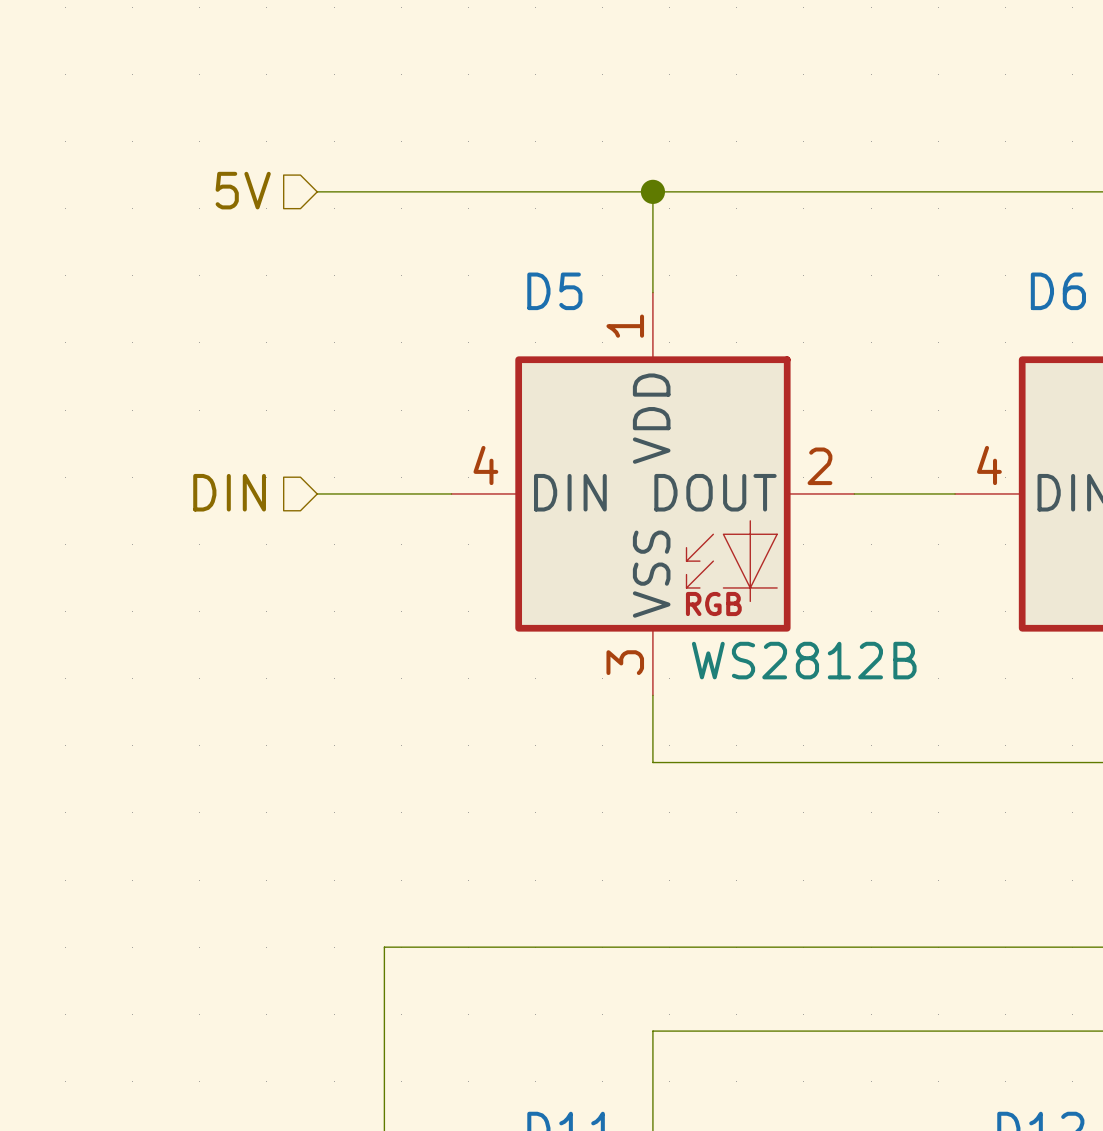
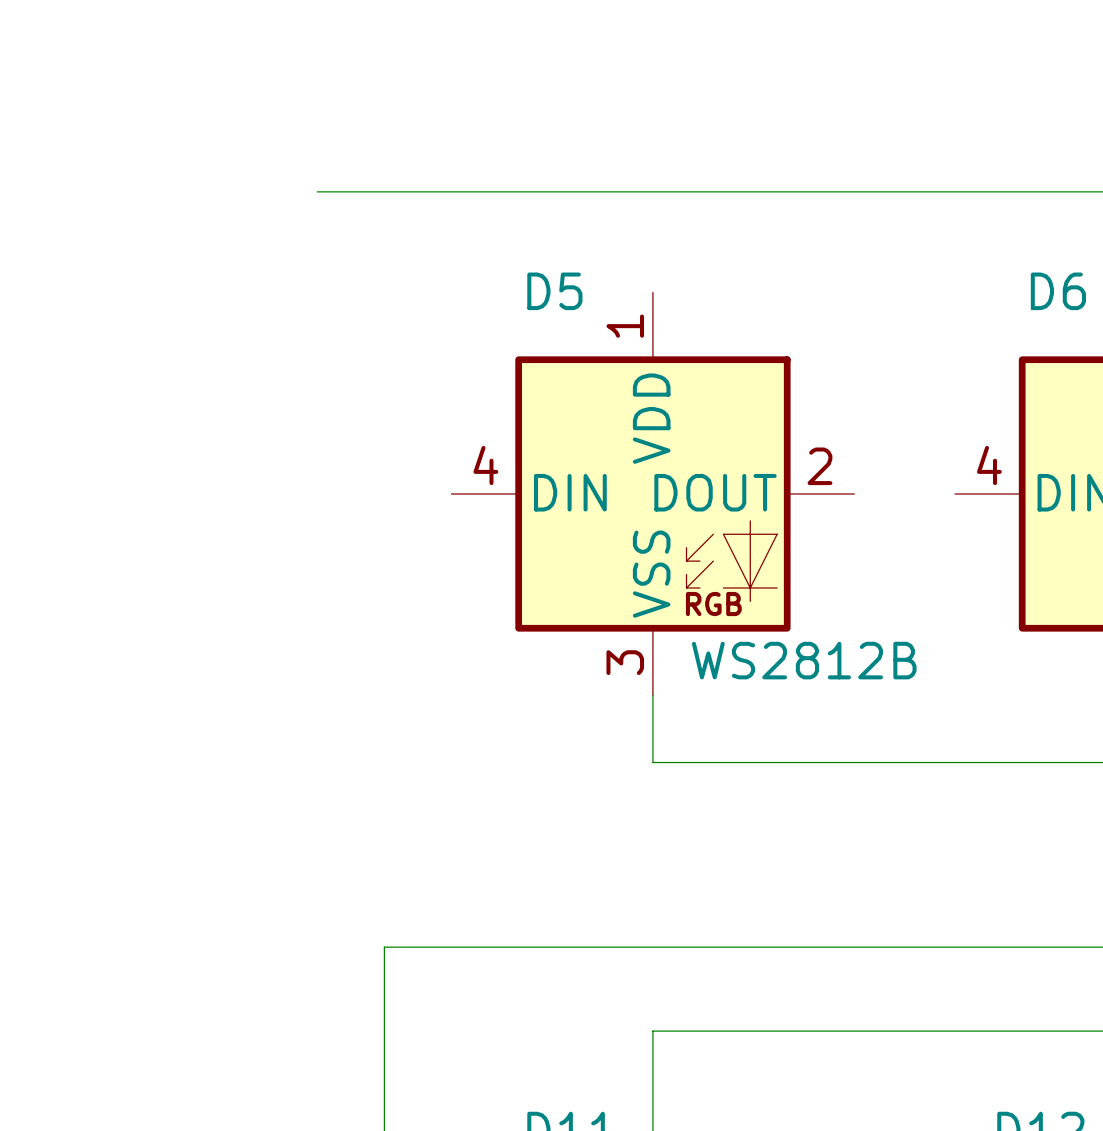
hierarchical label: 5V (243, 190) -> none
wire: (652, 191) (652, 292) -> none
junction: (652, 191) -> none
hierarchical label: DIN (229, 492) -> none
wire: (317, 493) (451, 493) -> none
wire: (854, 493) (955, 493) -> none

